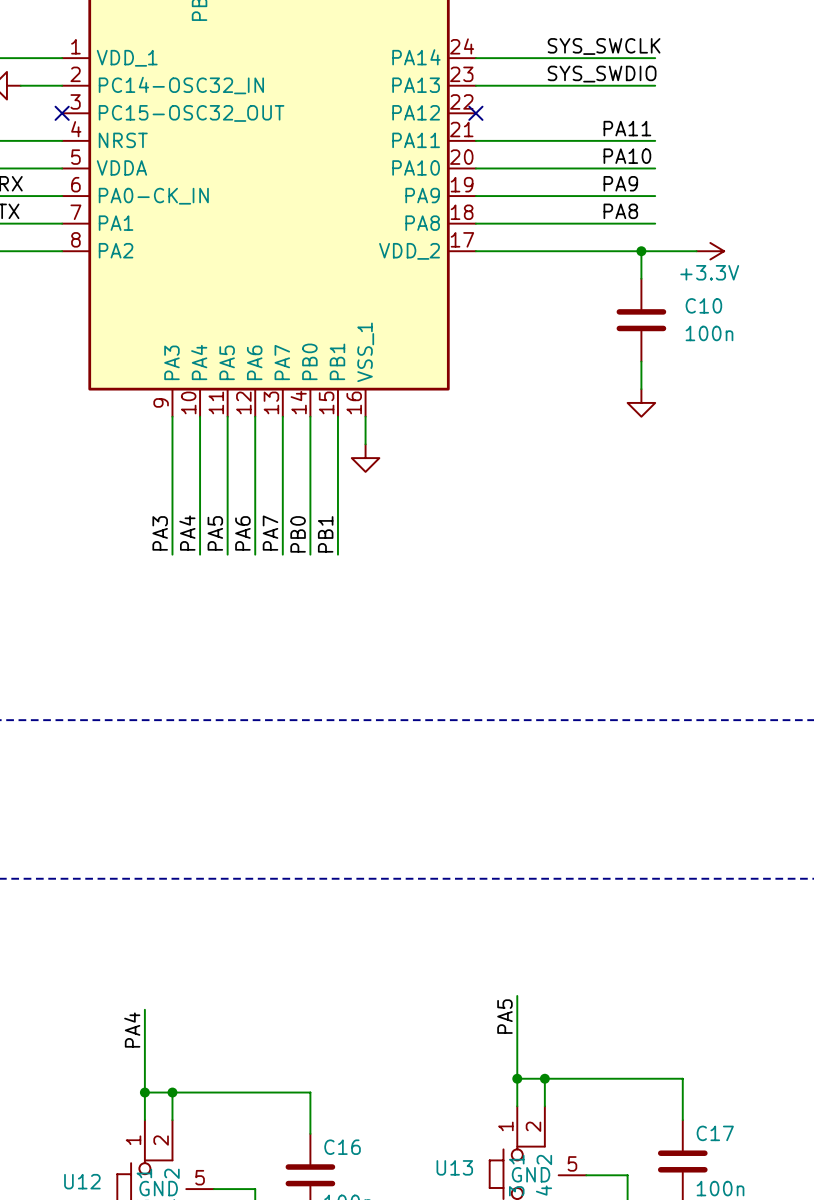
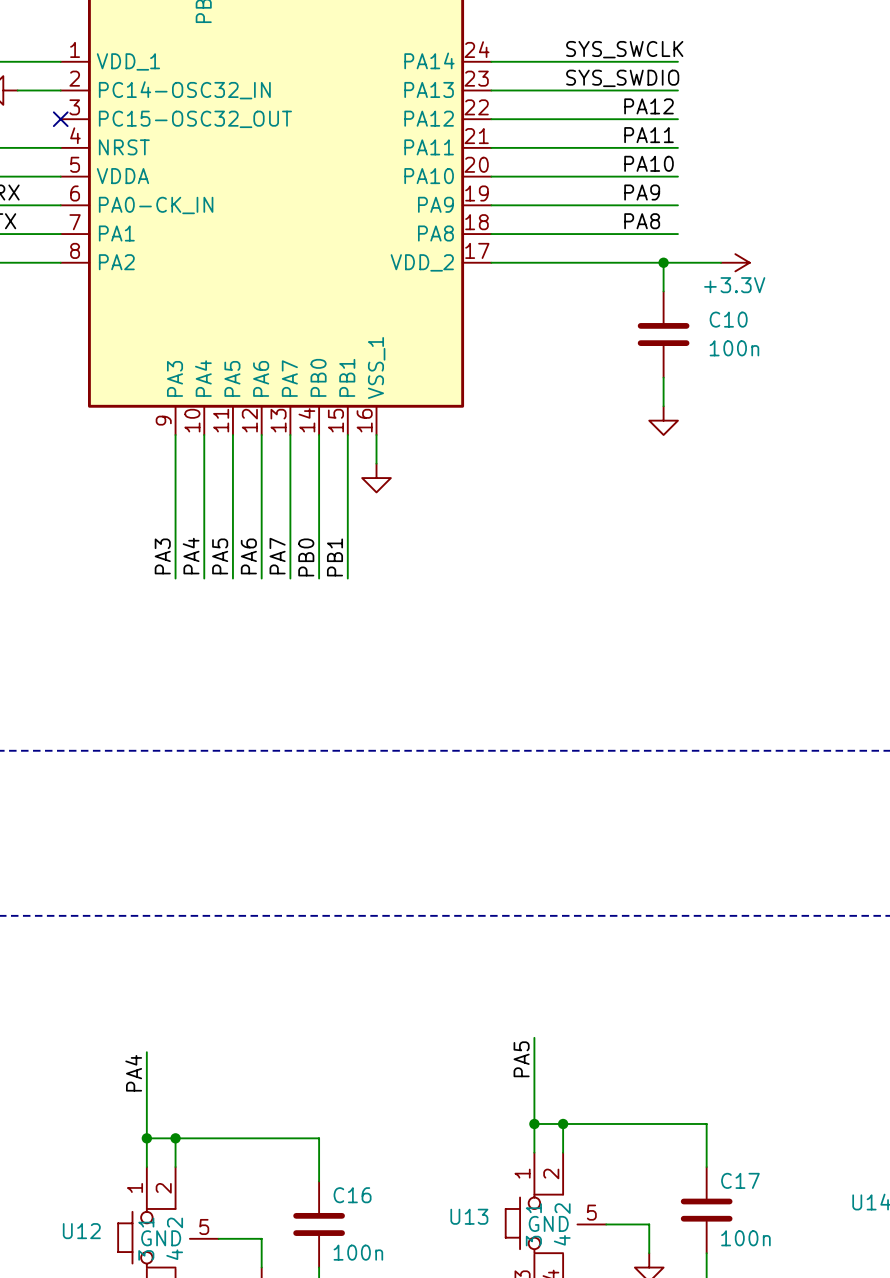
label: none -> PA12 (649, 106)
wire: none -> (491, 119) (677, 119)
no-connect mark: (475, 113) -> none

